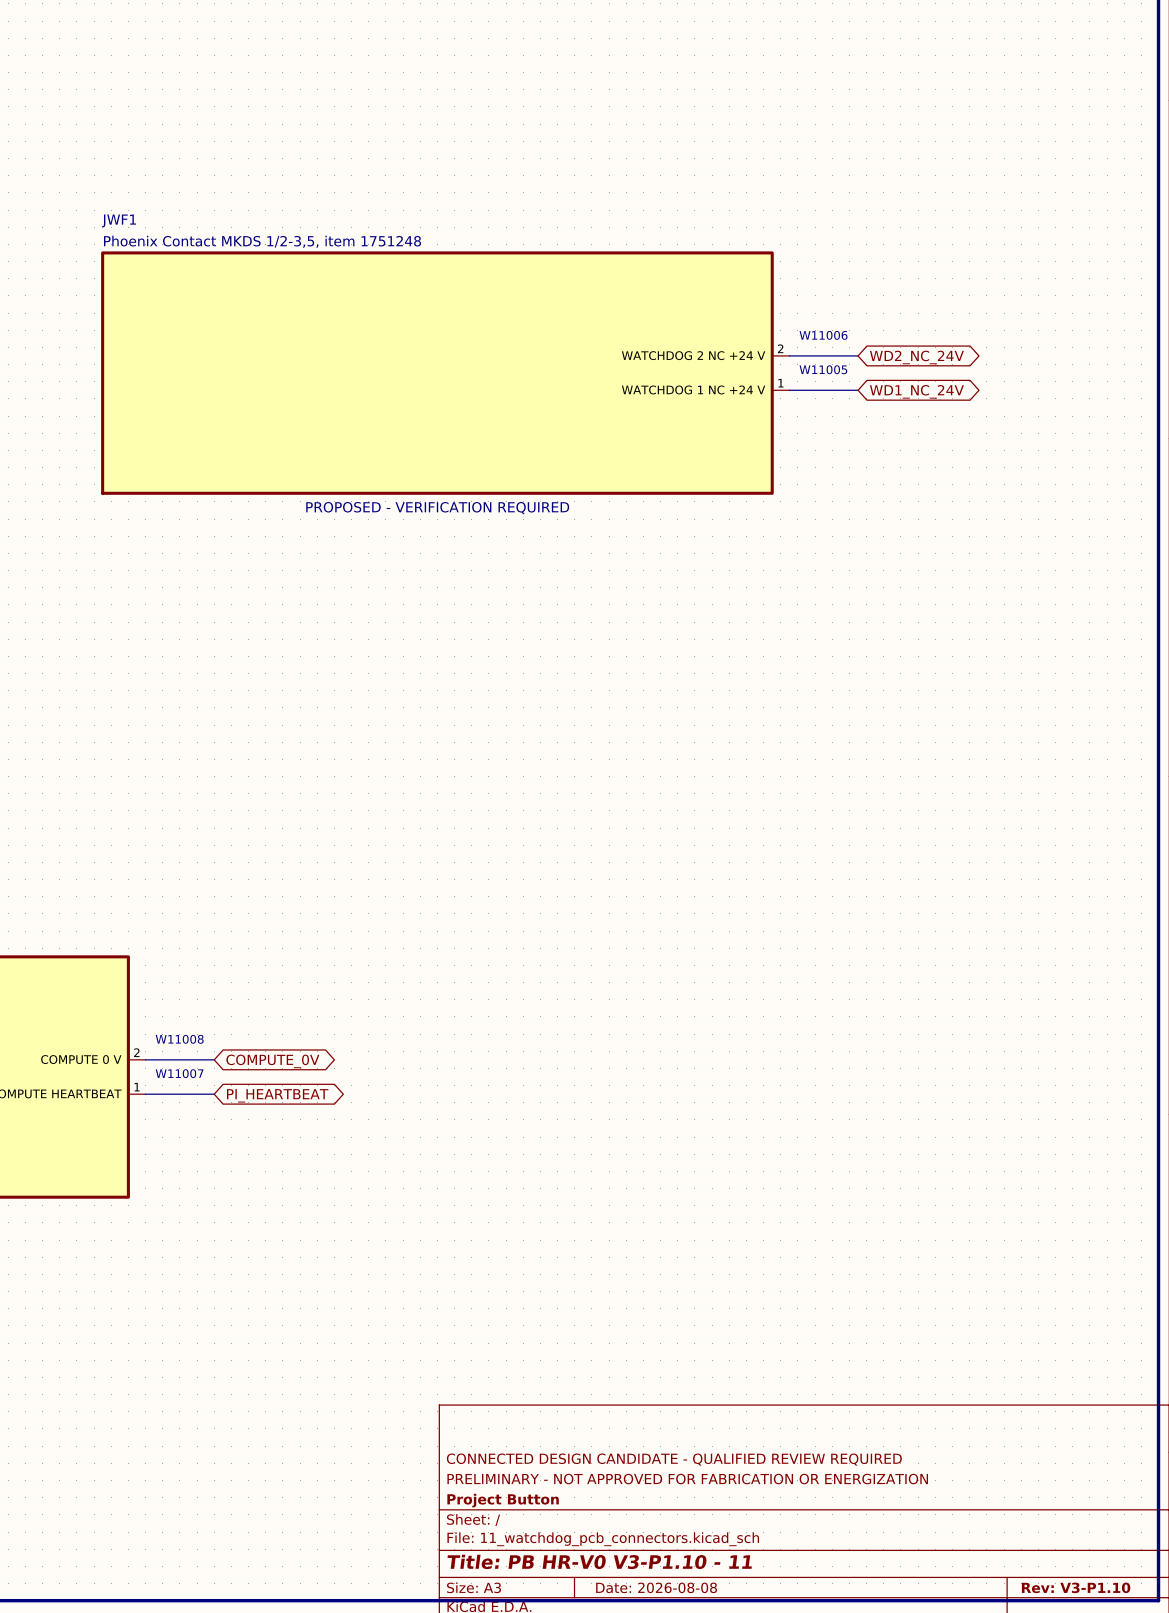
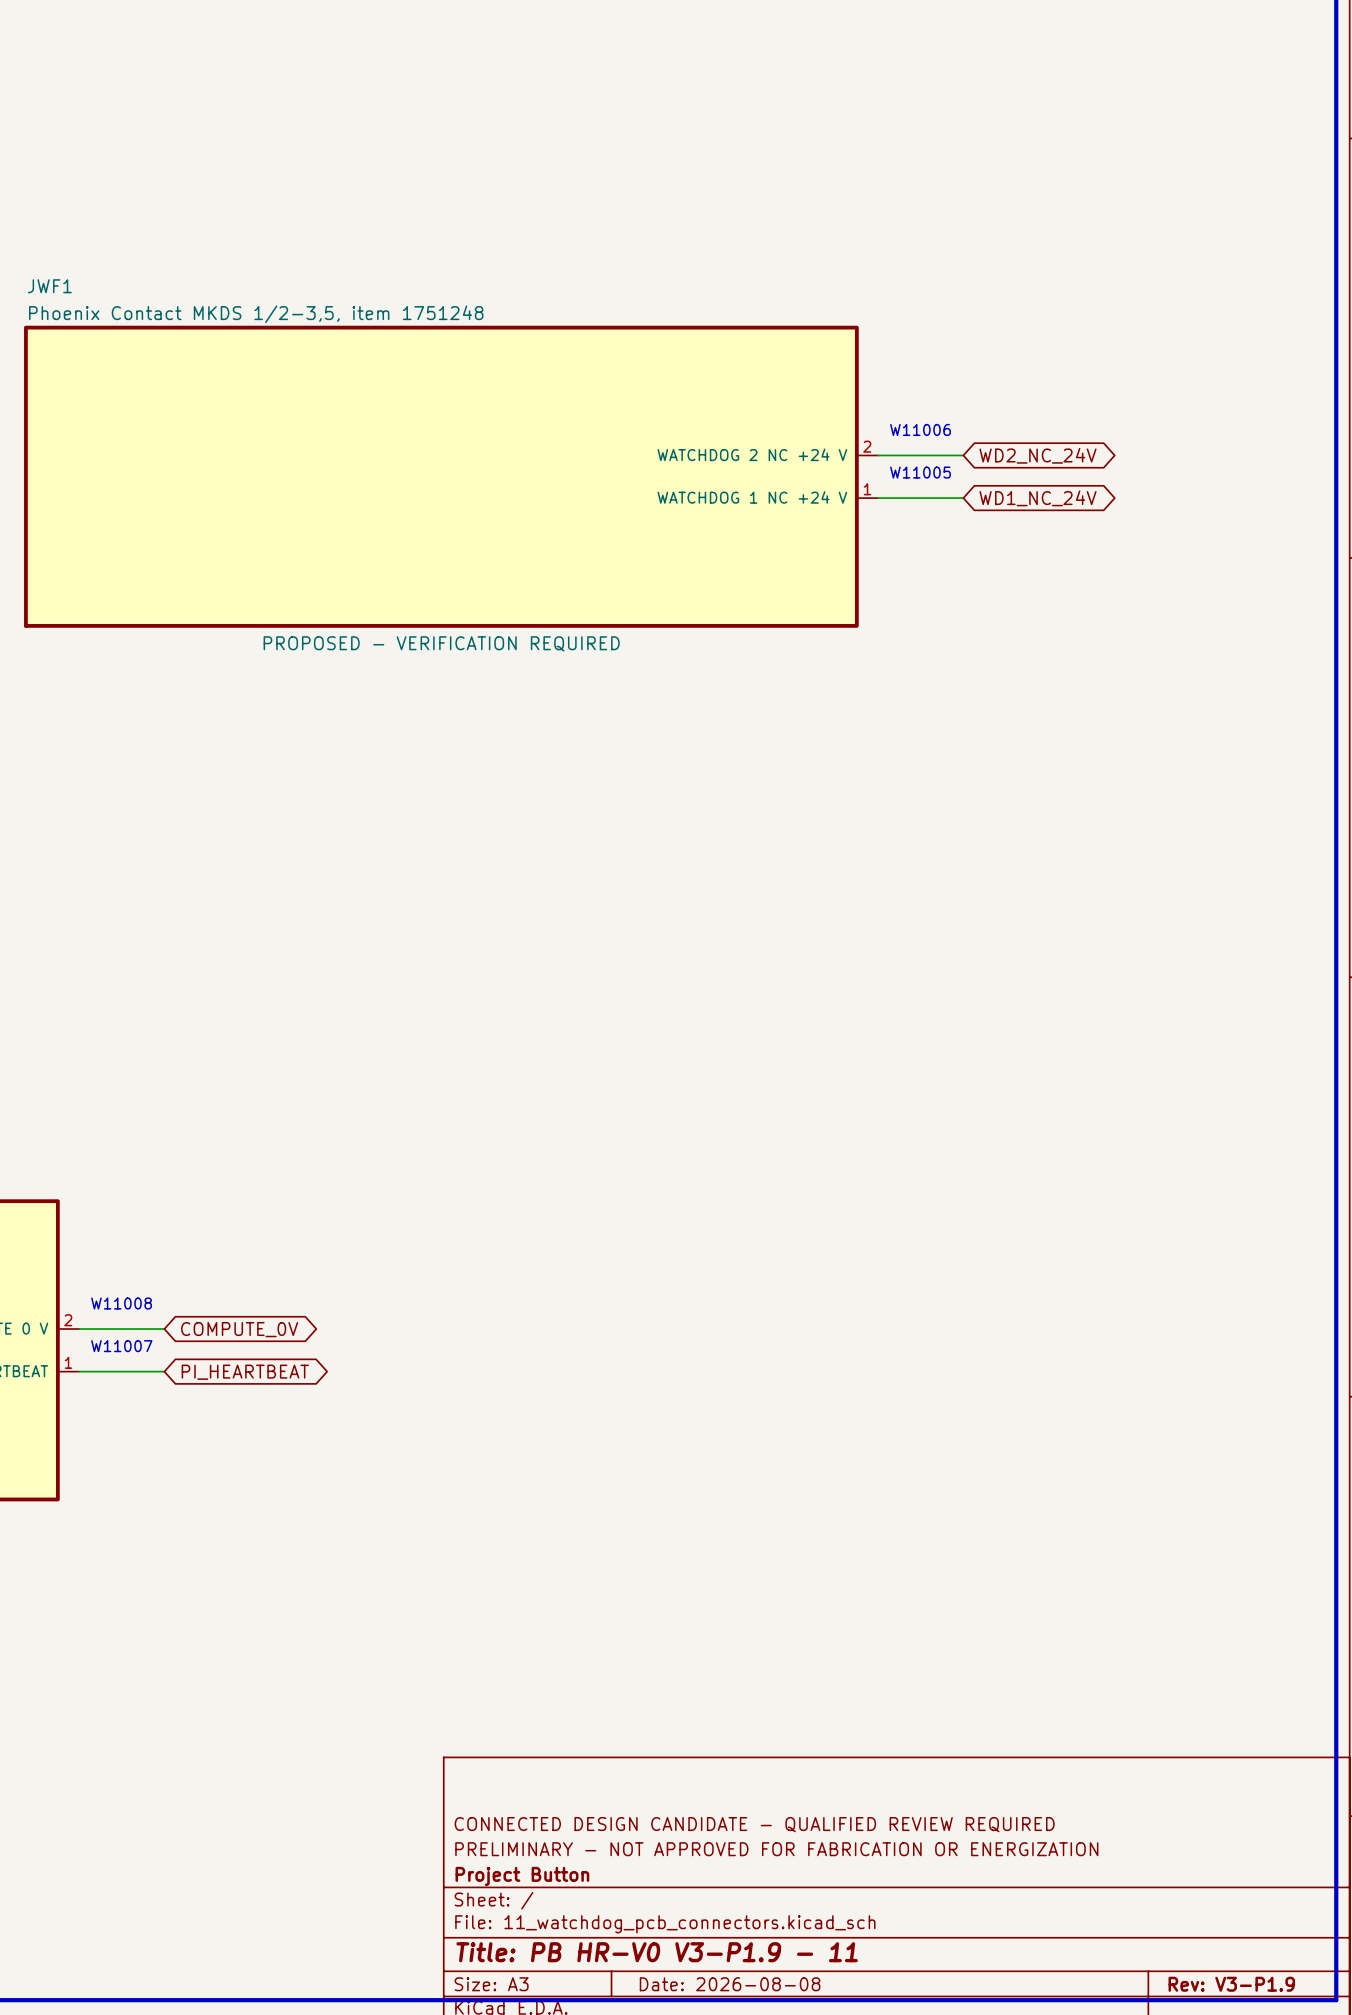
title block: Title: PB HR-V0 V3-P1.10 - 11 (599, 1561) -> Title: PB HR-V0 V3-P1.9 - 11 (657, 1952)
title block: Rev: V3-P1.10 (1076, 1587) -> Rev: V3-P1.9 (1231, 1984)

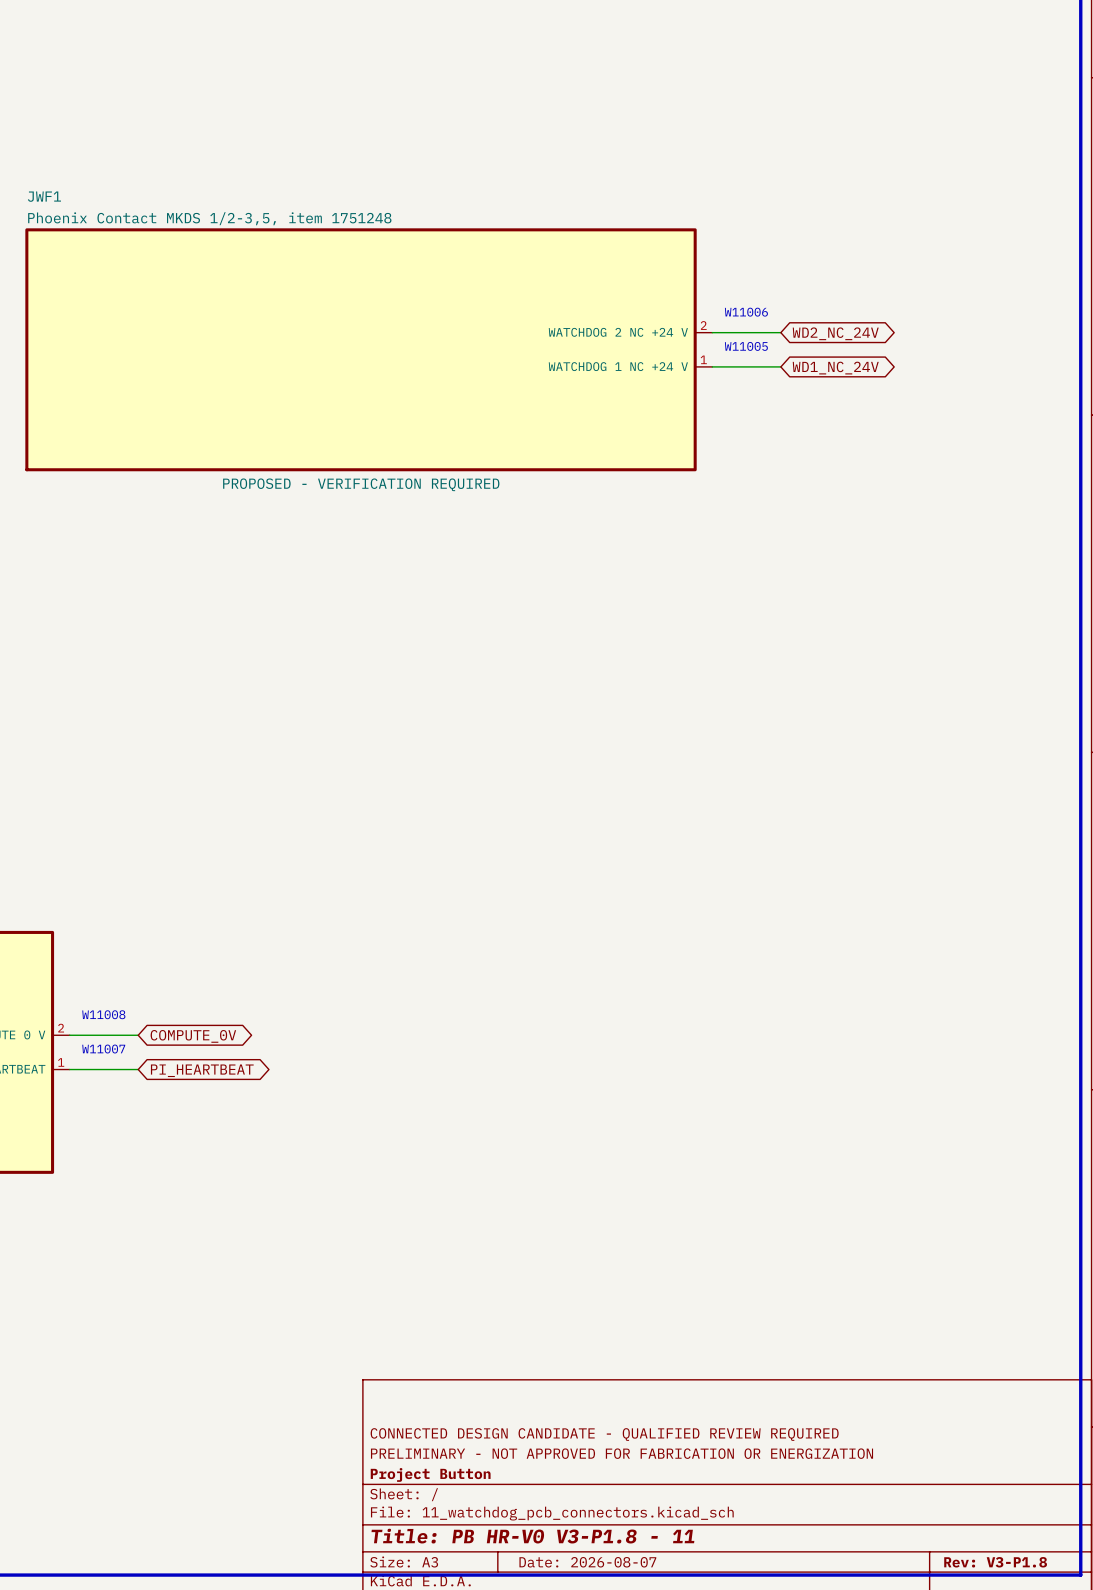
title block: Title: PB HR-V0 V3-P1.9 - 11 (657, 1952) -> Title: PB HR-V0 V3-P1.8 - 11 (532, 1536)
title block: Date: 2026-08-08 (730, 1984) -> Date: 2026-08-07 (587, 1562)
title block: Rev: V3-P1.9 (1231, 1984) -> Rev: V3-P1.8 (995, 1562)

